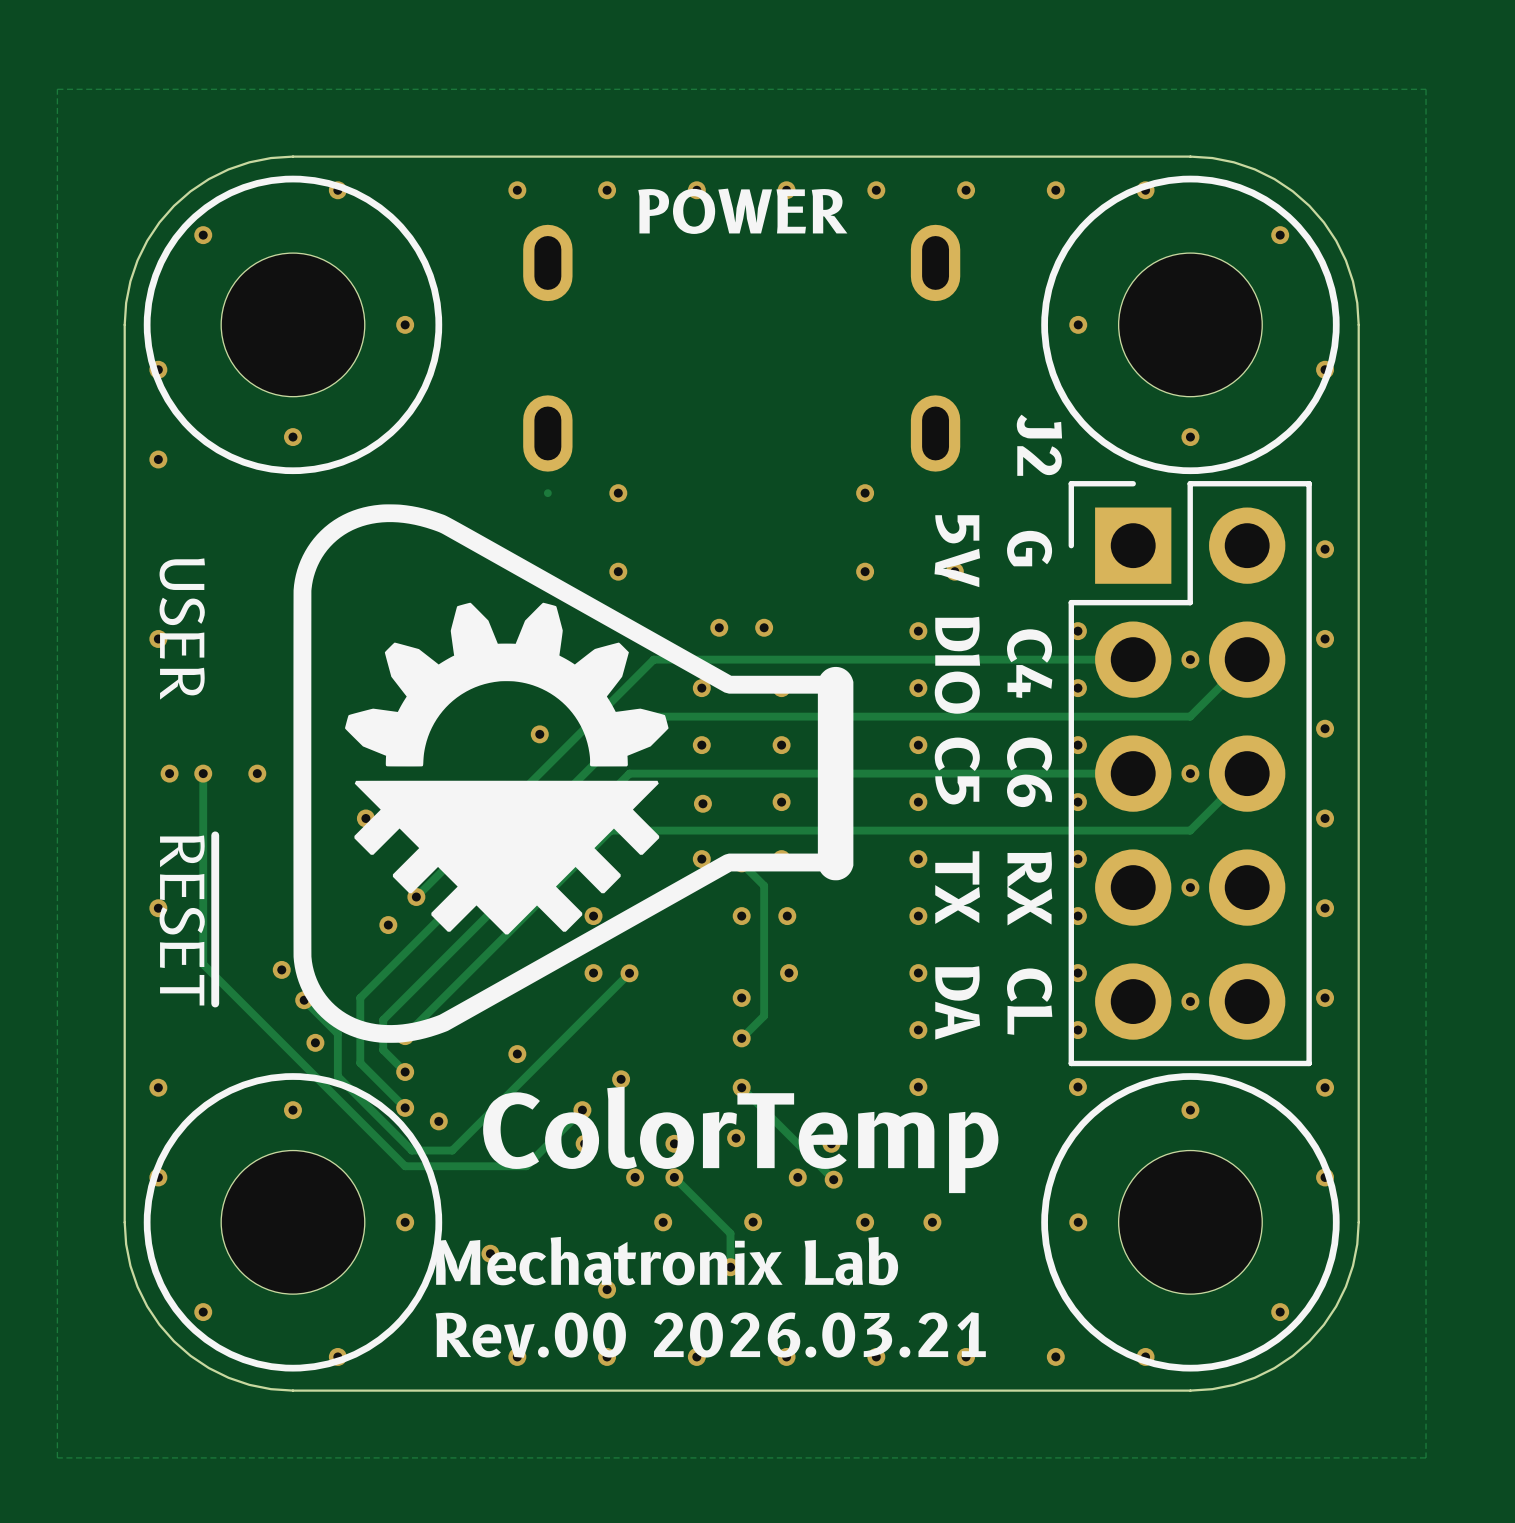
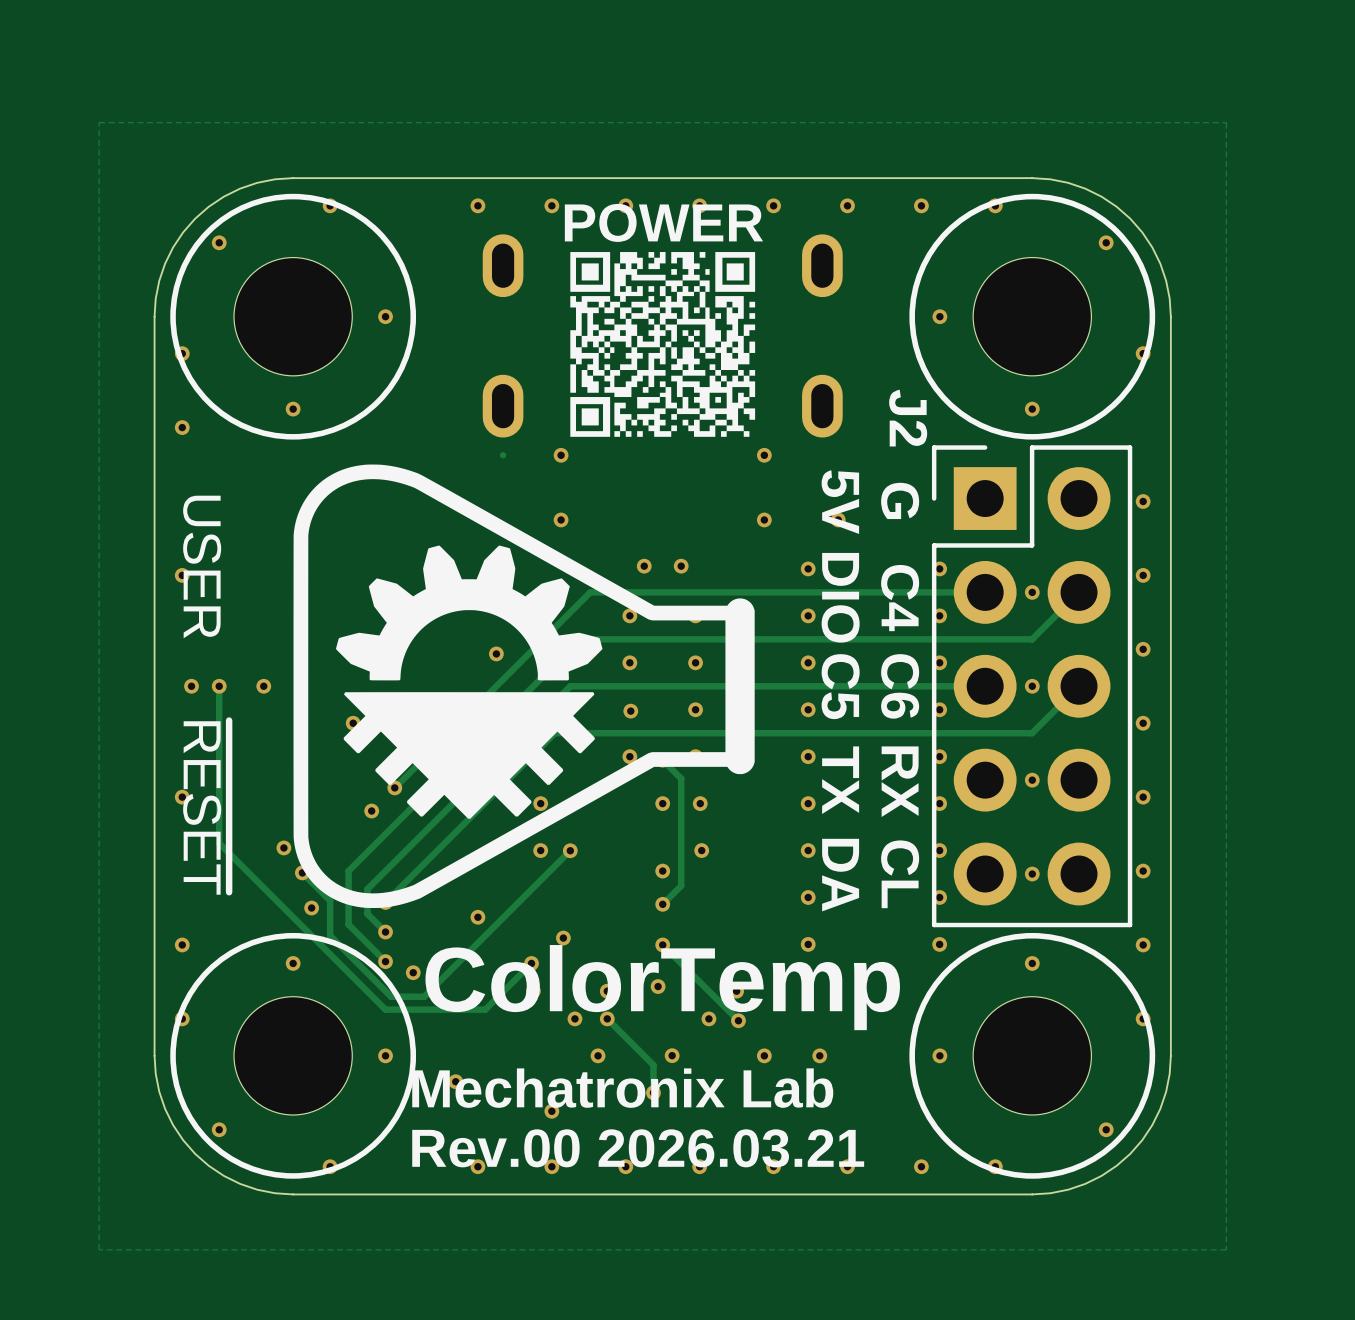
drawing: none -> [570, 252, 756, 437]

